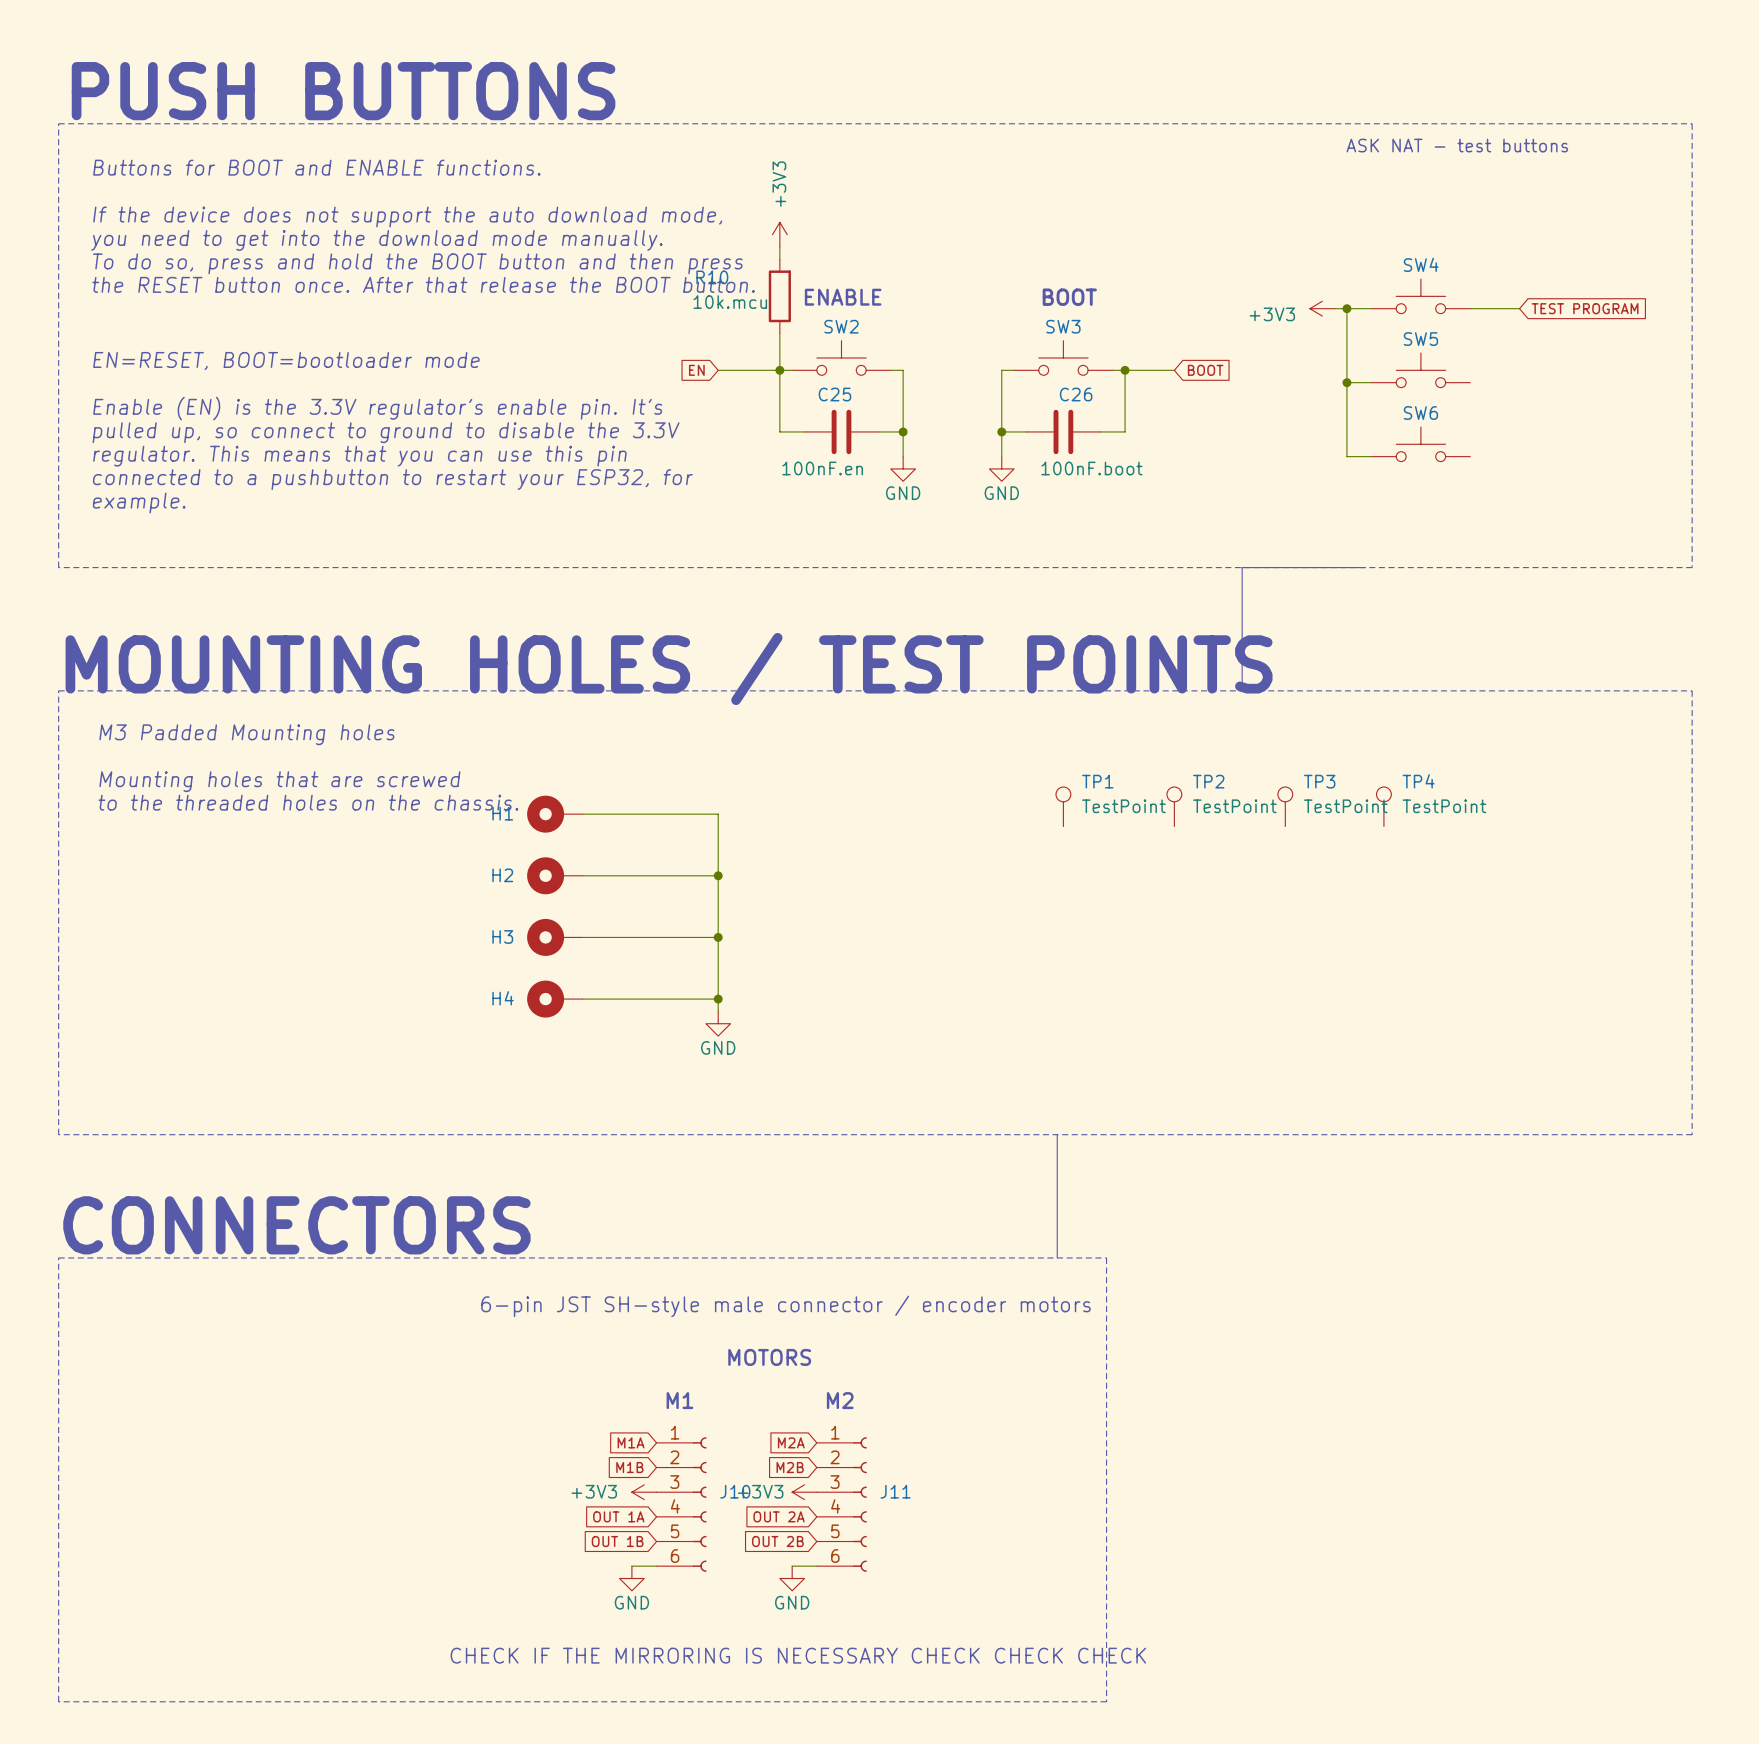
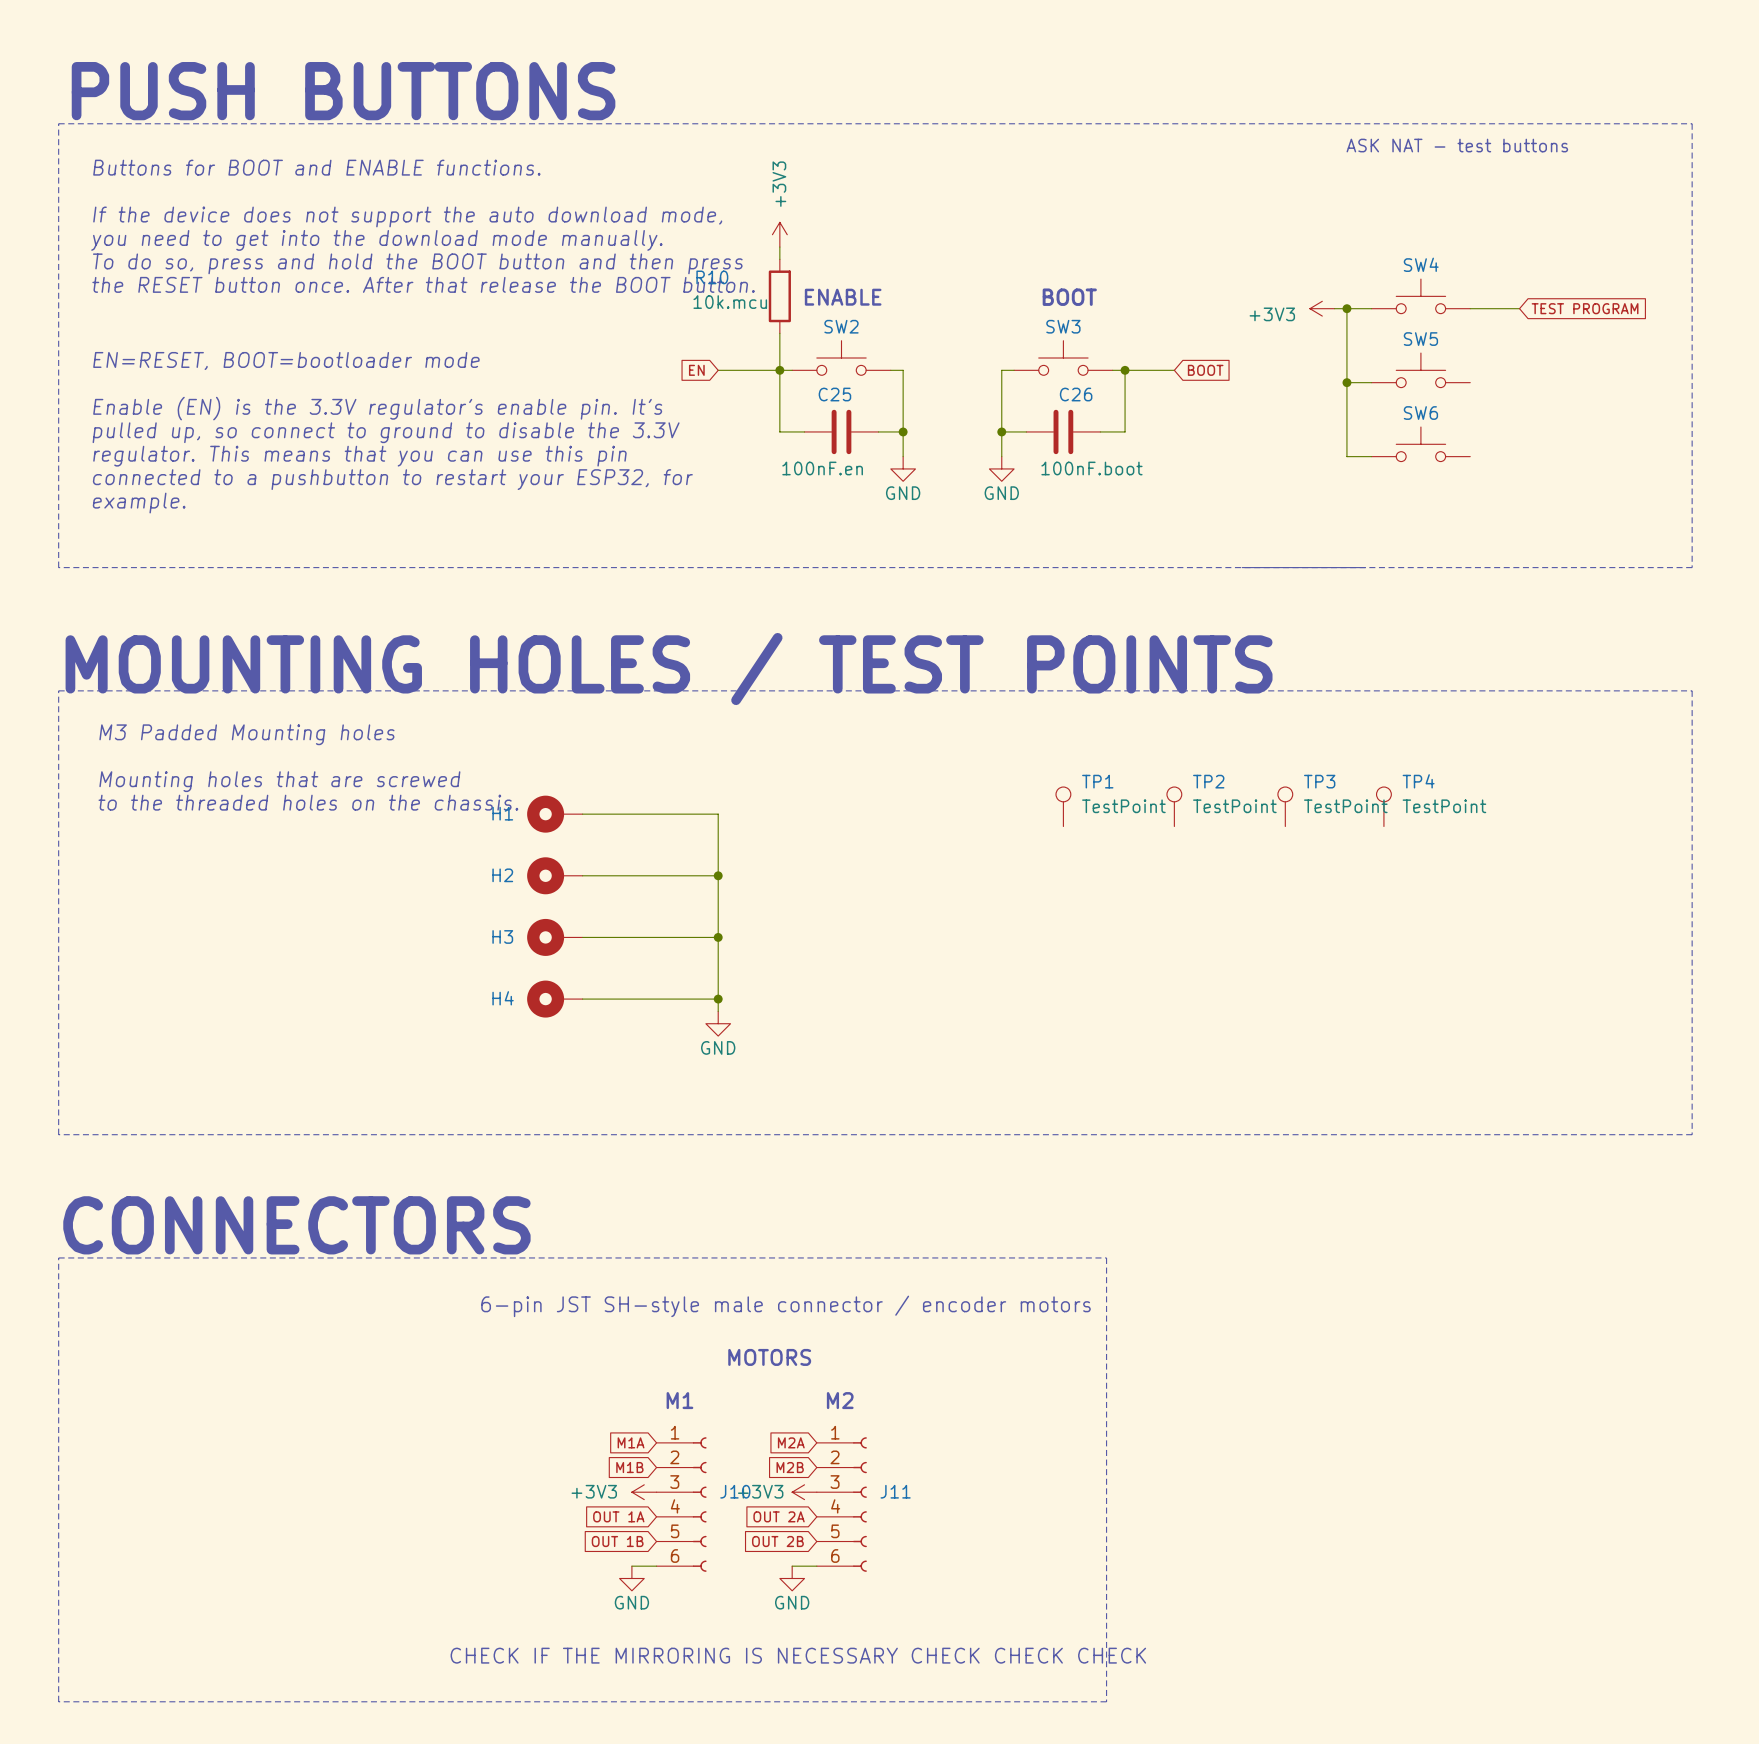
line: (1242, 567) (1242, 690) -> none
line: (1057, 1134) (1057, 1257) -> none

